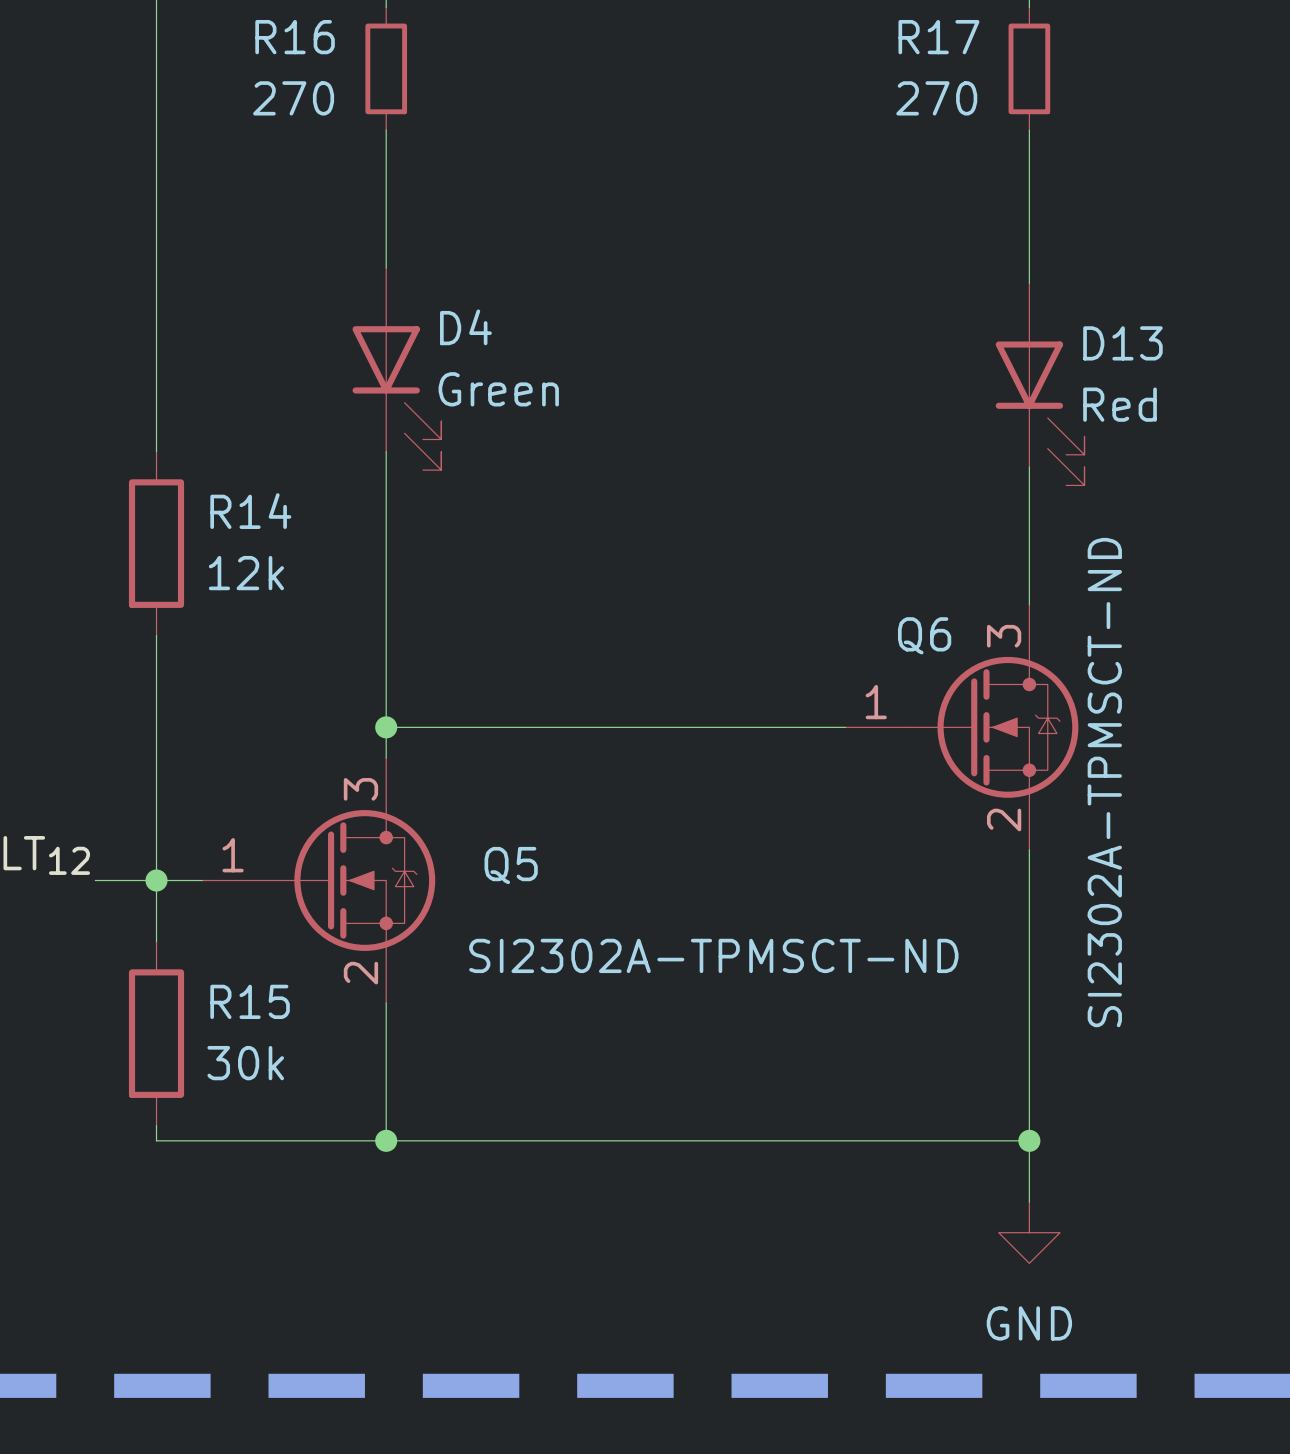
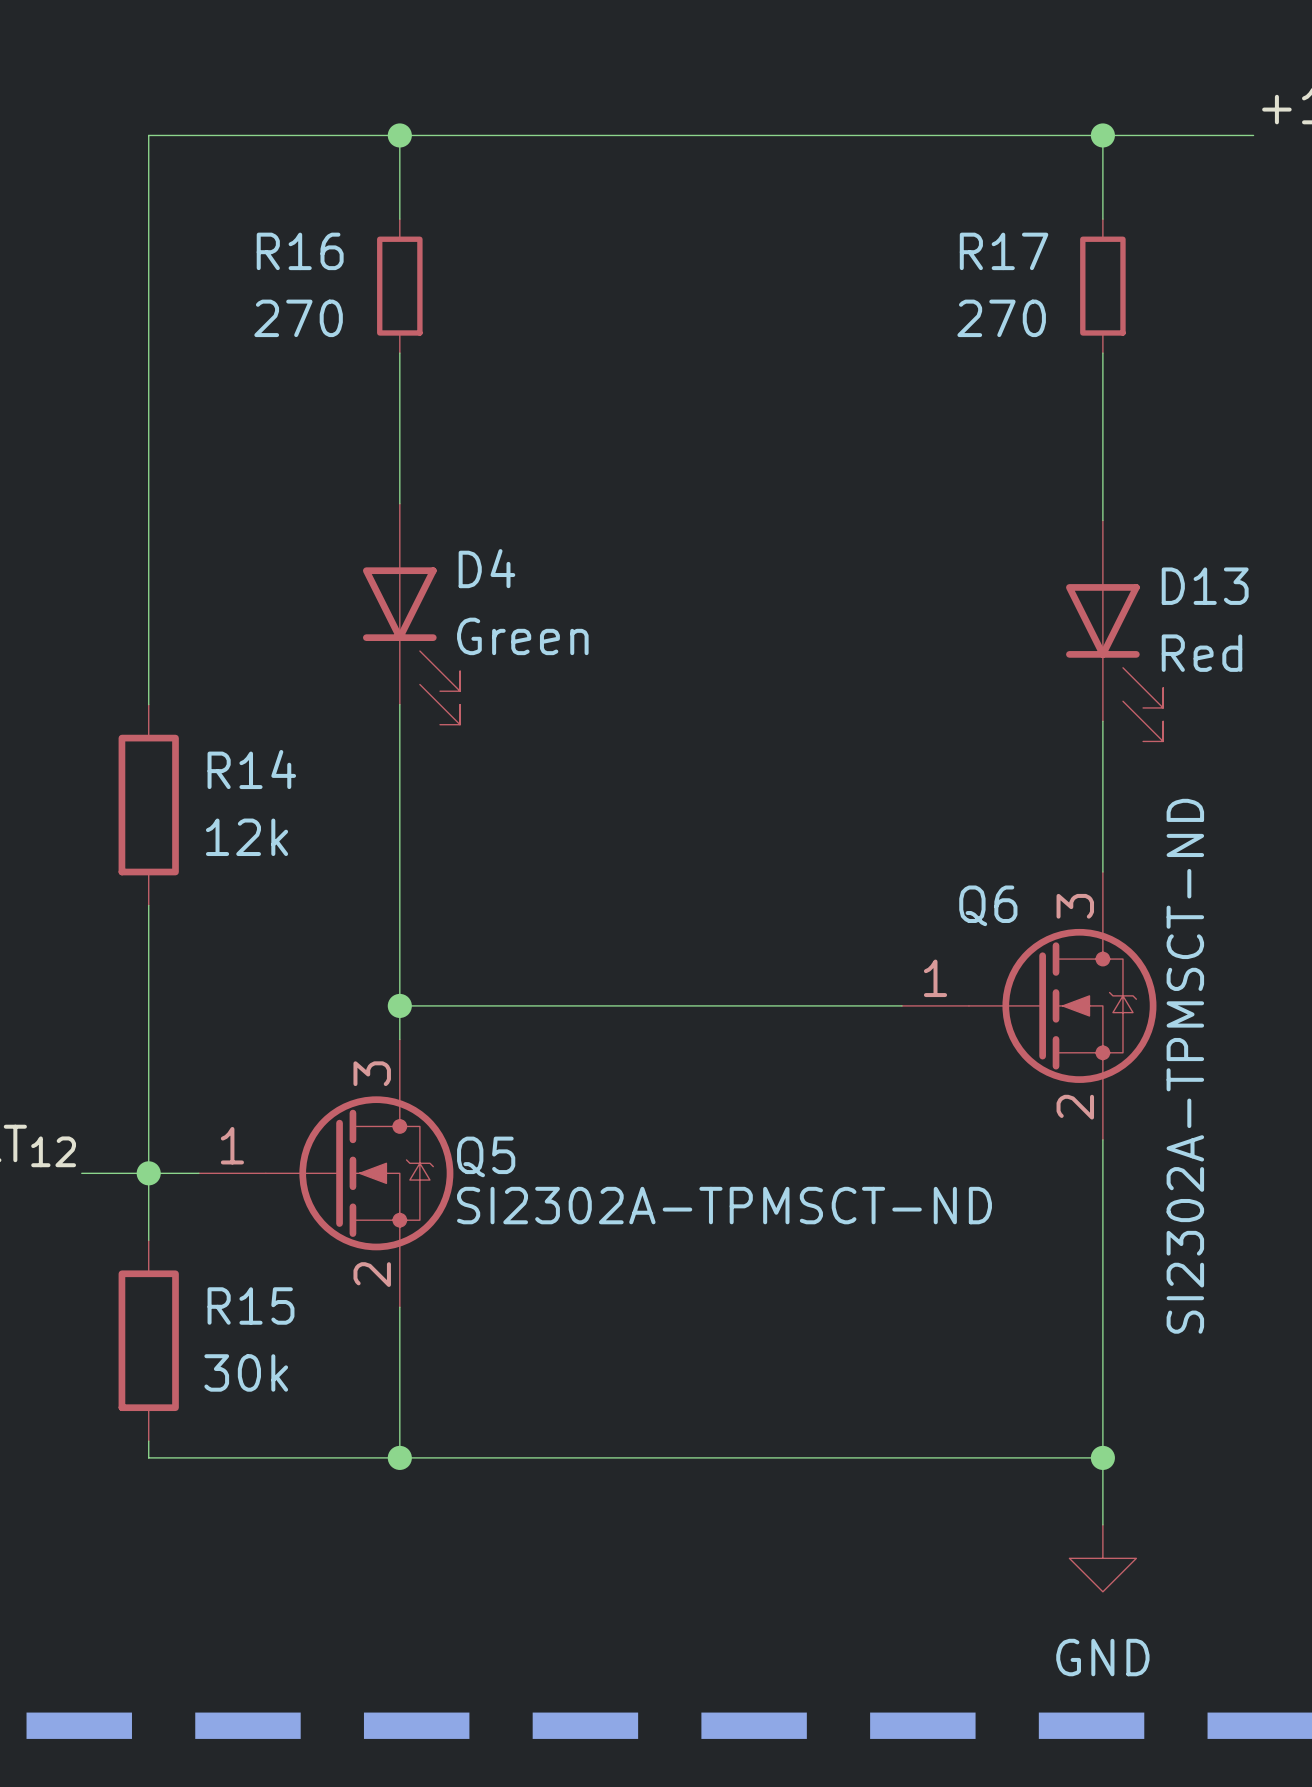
Q5 name position: Q5 (511, 865) -> Q5 (486, 1156)
Q5 value position: SI2302A-TPMSCT-ND (713, 955) -> SI2302A-TPMSCT-ND (724, 1205)

